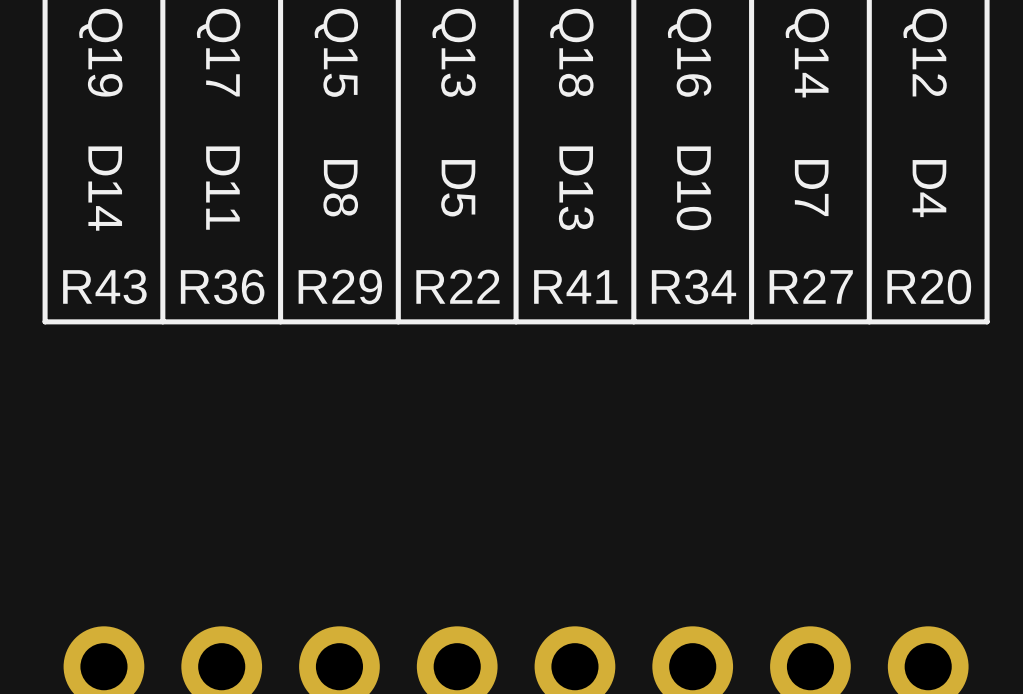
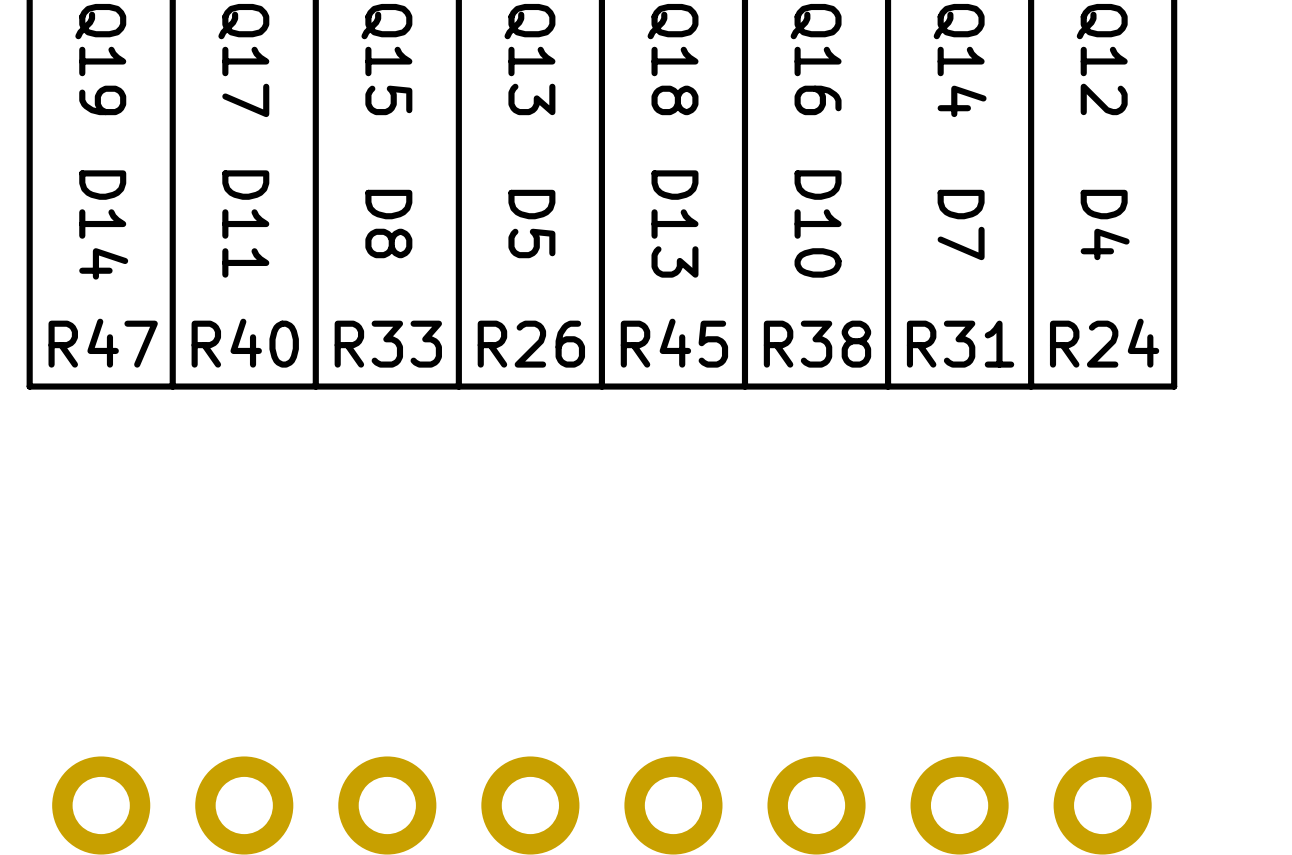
R43 name: R43 (104, 286) -> R47 (103, 343)
R36 name: R36 (222, 286) -> R40 (245, 343)
R29 name: R29 (340, 286) -> R33 (388, 344)
R22 name: R22 (457, 286) -> R26 (531, 344)
R41 name: R41 (575, 286) -> R45 (674, 343)
R34 name: R34 (693, 286) -> R38 (817, 344)
R27 name: R27 (811, 286) -> R31 (960, 344)
R20 name: R20 (929, 286) -> R24 (1104, 343)

